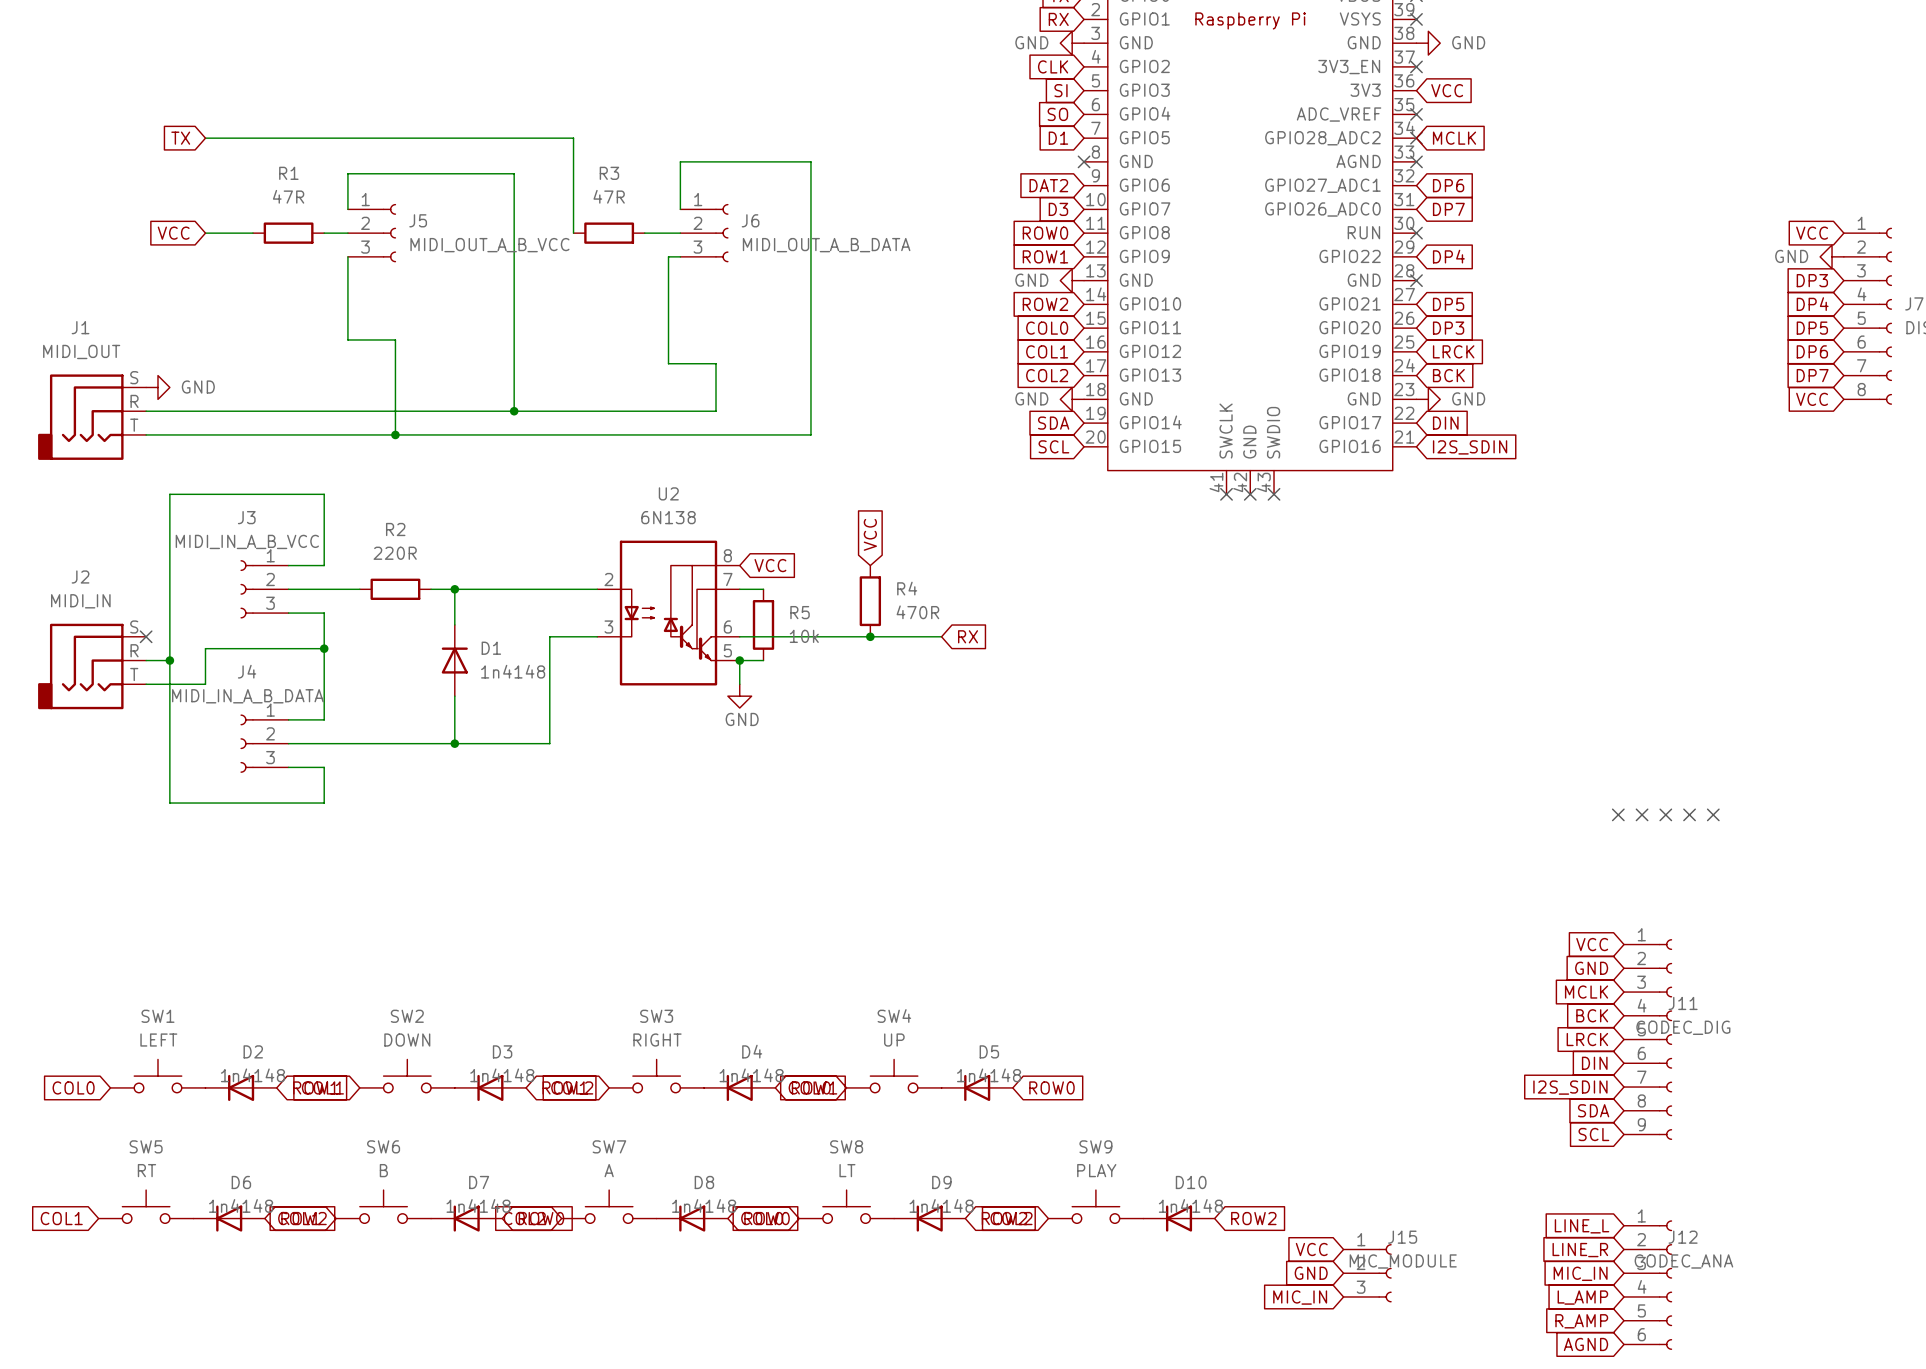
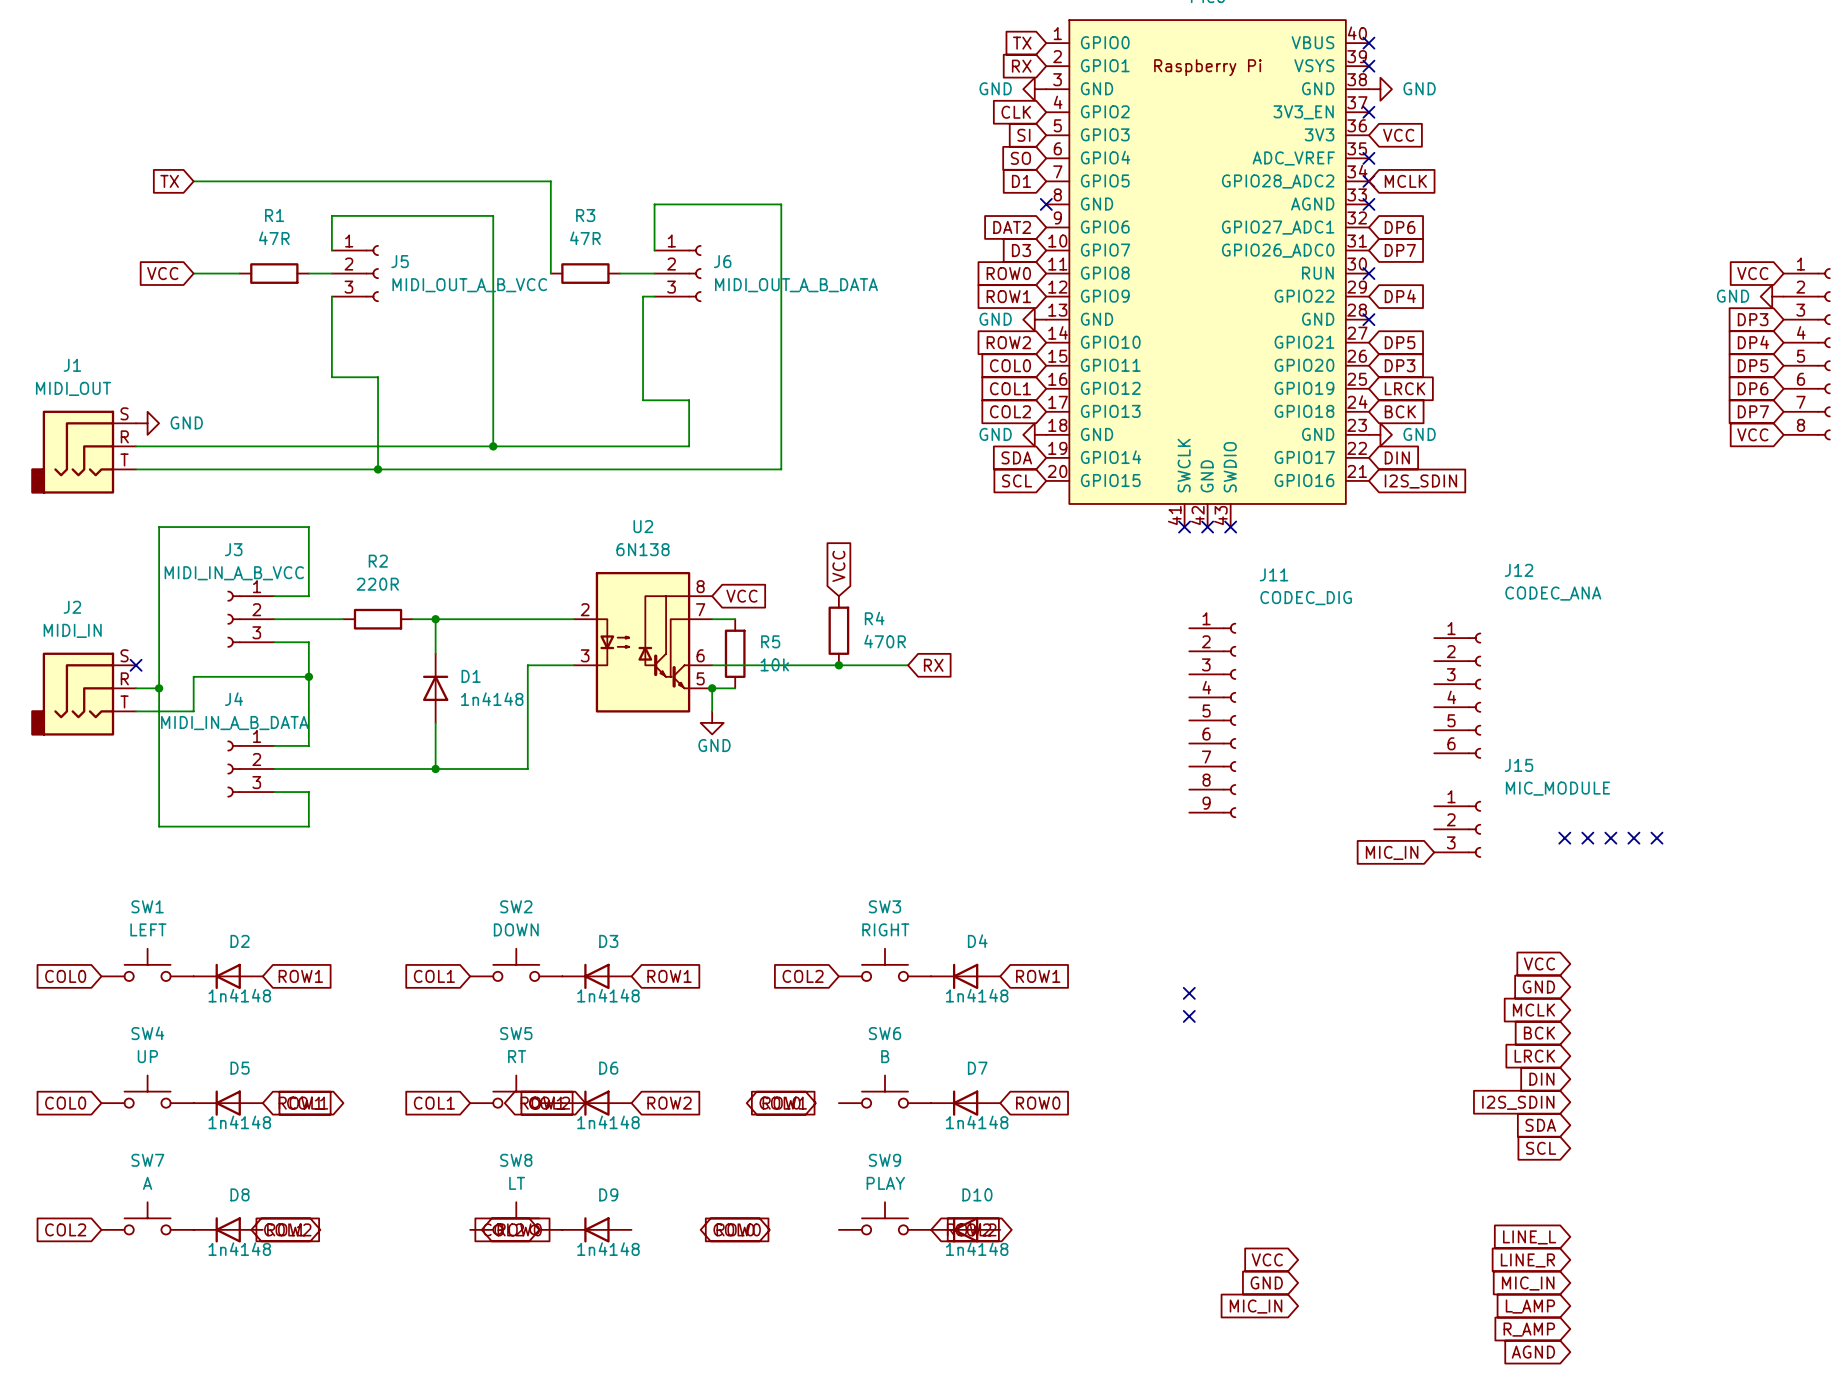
global label: none -> MIC_IN (1392, 852)
SW1: none -> LEFT (147, 964)
global label: none -> COL0 (65, 976)
D2: none -> 1n4148 (228, 976)
global label: none -> ROW1 (300, 976)
global label: none -> COL1 (434, 976)
global label: none -> ROW1 (669, 976)
global label: none -> COL2 (803, 976)
global label: none -> ROW1 (1038, 976)
no-connect mark: none -> (1189, 993)
no-connect mark: none -> (1189, 1016)
J11 name position: J11 (1683, 1003) -> J11 (1274, 574)
SW1 name: SW1 (157, 1016) -> SW4 (147, 1033)
J11 value position: CODEC_DIG (1683, 1027) -> CODEC_DIG (1306, 598)
J11 position: (1648, 1039) -> (1212, 720)
SW1 value: LEFT (158, 1040) -> UP (147, 1056)
D2 name: D2 (253, 1051) -> D5 (240, 1068)
D2 value position: 1n4148 (252, 1075) -> 1n4148 (239, 1122)
D3 value position: 1n4148 (502, 1075) -> 1n4148 (608, 995)
D4 value position: 1n4148 (751, 1075) -> 1n4148 (977, 995)
SW2 position: (407, 1076) -> (516, 964)
SW3 position: (656, 1076) -> (884, 964)
SW4: UP (894, 1076) -> none
global label: none -> COL1 (434, 1103)
D3 position: (490, 1087) -> (596, 976)
global label: none -> ROW2 (669, 1103)
D4 position: (739, 1087) -> (965, 976)
D5: 1n4148 (977, 1087) -> none
global label position: ROW0 (1051, 1087) -> ROW0 (1038, 1103)
D6 value position: 1n4148 (241, 1205) -> 1n4148 (608, 1122)
D7 value position: 1n4148 (478, 1205) -> 1n4148 (977, 1122)
D8 value position: 1n4148 (704, 1205) -> 1n4148 (239, 1249)
D9 value position: 1n4148 (941, 1205) -> 1n4148 (608, 1249)
D10 value position: 1n4148 (1190, 1205) -> 1n4148 (977, 1249)
SW5 position: (146, 1206) -> (516, 1091)
SW6 position: (383, 1206) -> (884, 1091)
SW7 position: (609, 1206) -> (147, 1218)
SW8 position: (846, 1206) -> (516, 1218)
SW9 position: (1095, 1206) -> (884, 1218)
global label: COL1 (61, 1218) -> COL2 (65, 1229)
D6 position: (229, 1218) -> (596, 1103)
D7 position: (466, 1218) -> (965, 1103)
D8 position: (692, 1218) -> (228, 1229)
D9 position: (929, 1218) -> (596, 1229)
D10 position: (1179, 1218) -> (965, 1229)
global label: ROW2 (1253, 1218) -> none
J15 name position: J15 (1402, 1237) -> J15 (1519, 765)
J12 name position: J12 (1683, 1237) -> J12 (1519, 570)
J15 value position: MIC_MODULE (1403, 1261) -> MIC_MODULE (1557, 788)
J12 value position: CODEC_ANA (1683, 1261) -> CODEC_ANA (1553, 593)
J15 position: (1367, 1273) -> (1457, 829)
J12 position: (1648, 1285) -> (1457, 695)

